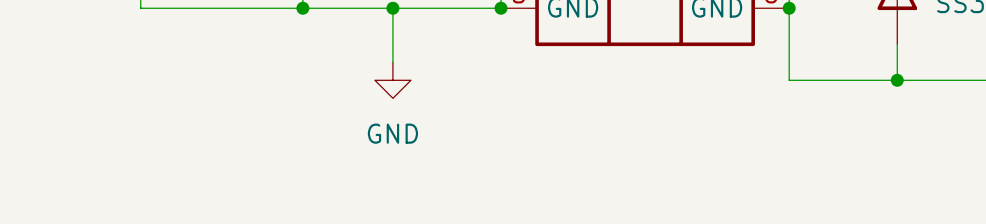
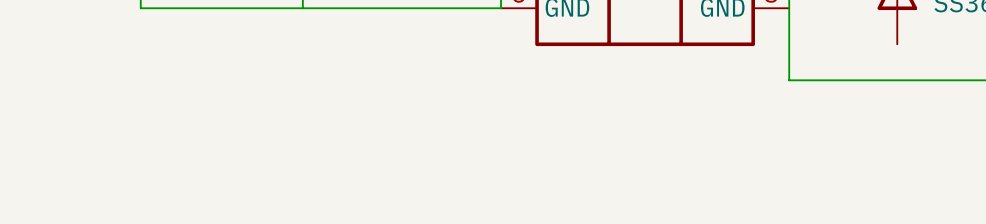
junction: (302, 8) -> none
wire: (392, 8) (392, 62) -> none
junction: (392, 8) -> none
junction: (501, 8) -> none
junction: (789, 8) -> none
wire: (897, 44) (897, 80) -> none
power symbol: GND (392, 80) -> none
junction: (897, 80) -> none

